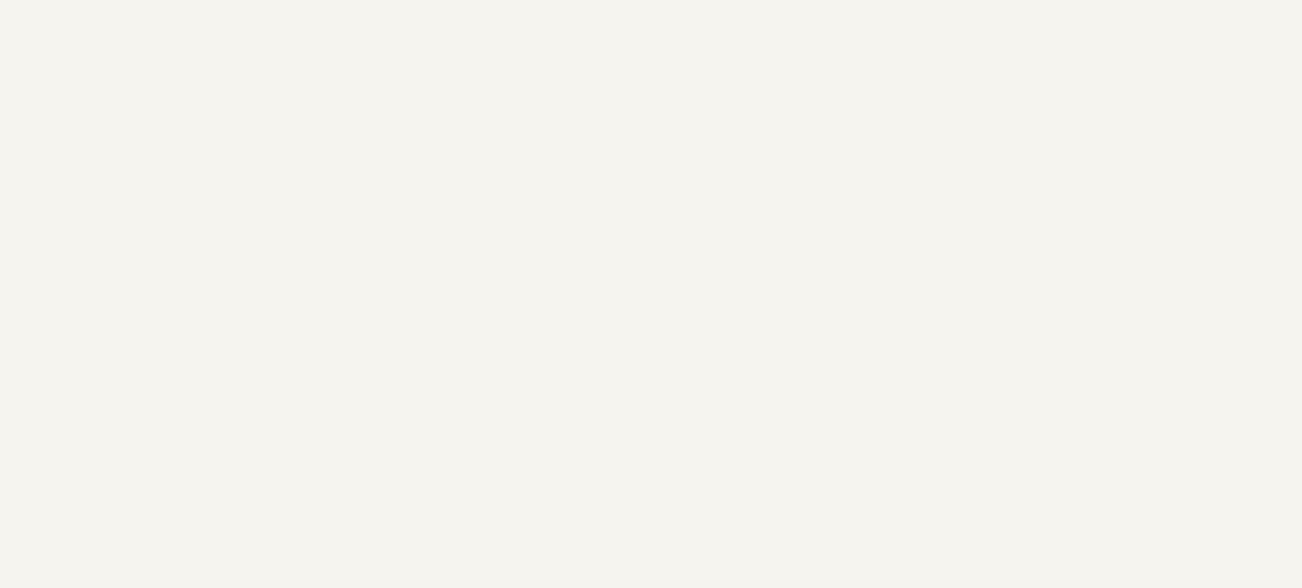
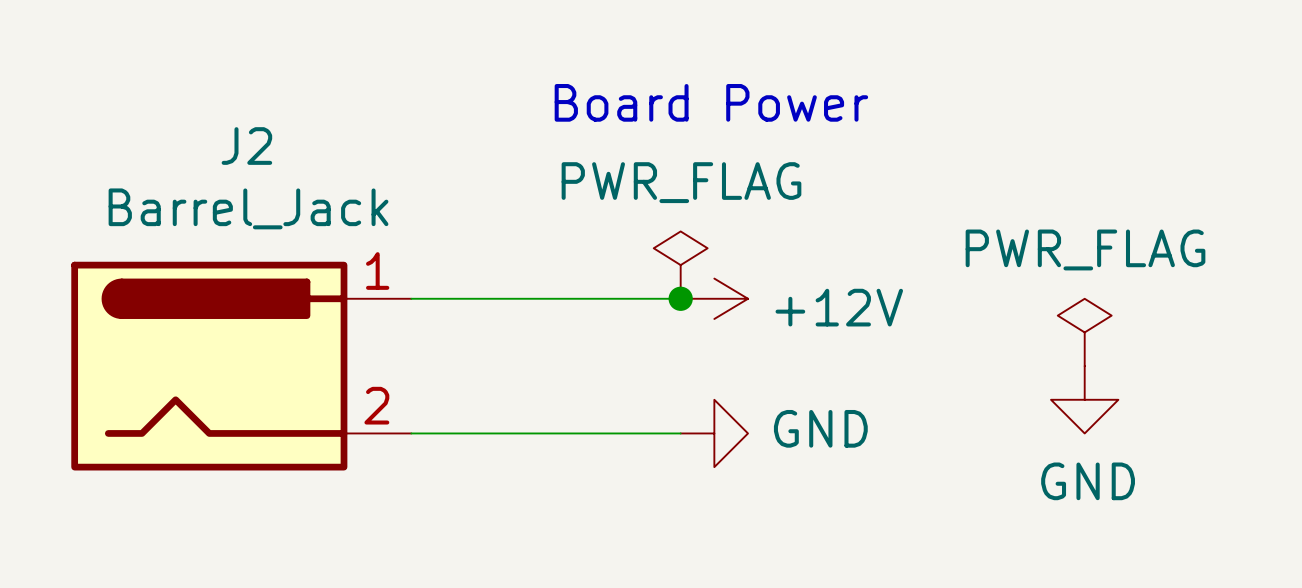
text: none -> Board Power (711, 102)
power symbol: none -> PWR_FLAG (680, 265)
wire: none -> (411, 298) (680, 298)
junction: none -> (680, 298)
power symbol: none -> +12V (714, 298)
power symbol: none -> PWR_FLAG (1084, 332)
J2: none -> Barrel_Jack (241, 366)
power symbol: none -> GND (1084, 399)
wire: none -> (411, 433) (680, 433)
power symbol: none -> GND (714, 433)

